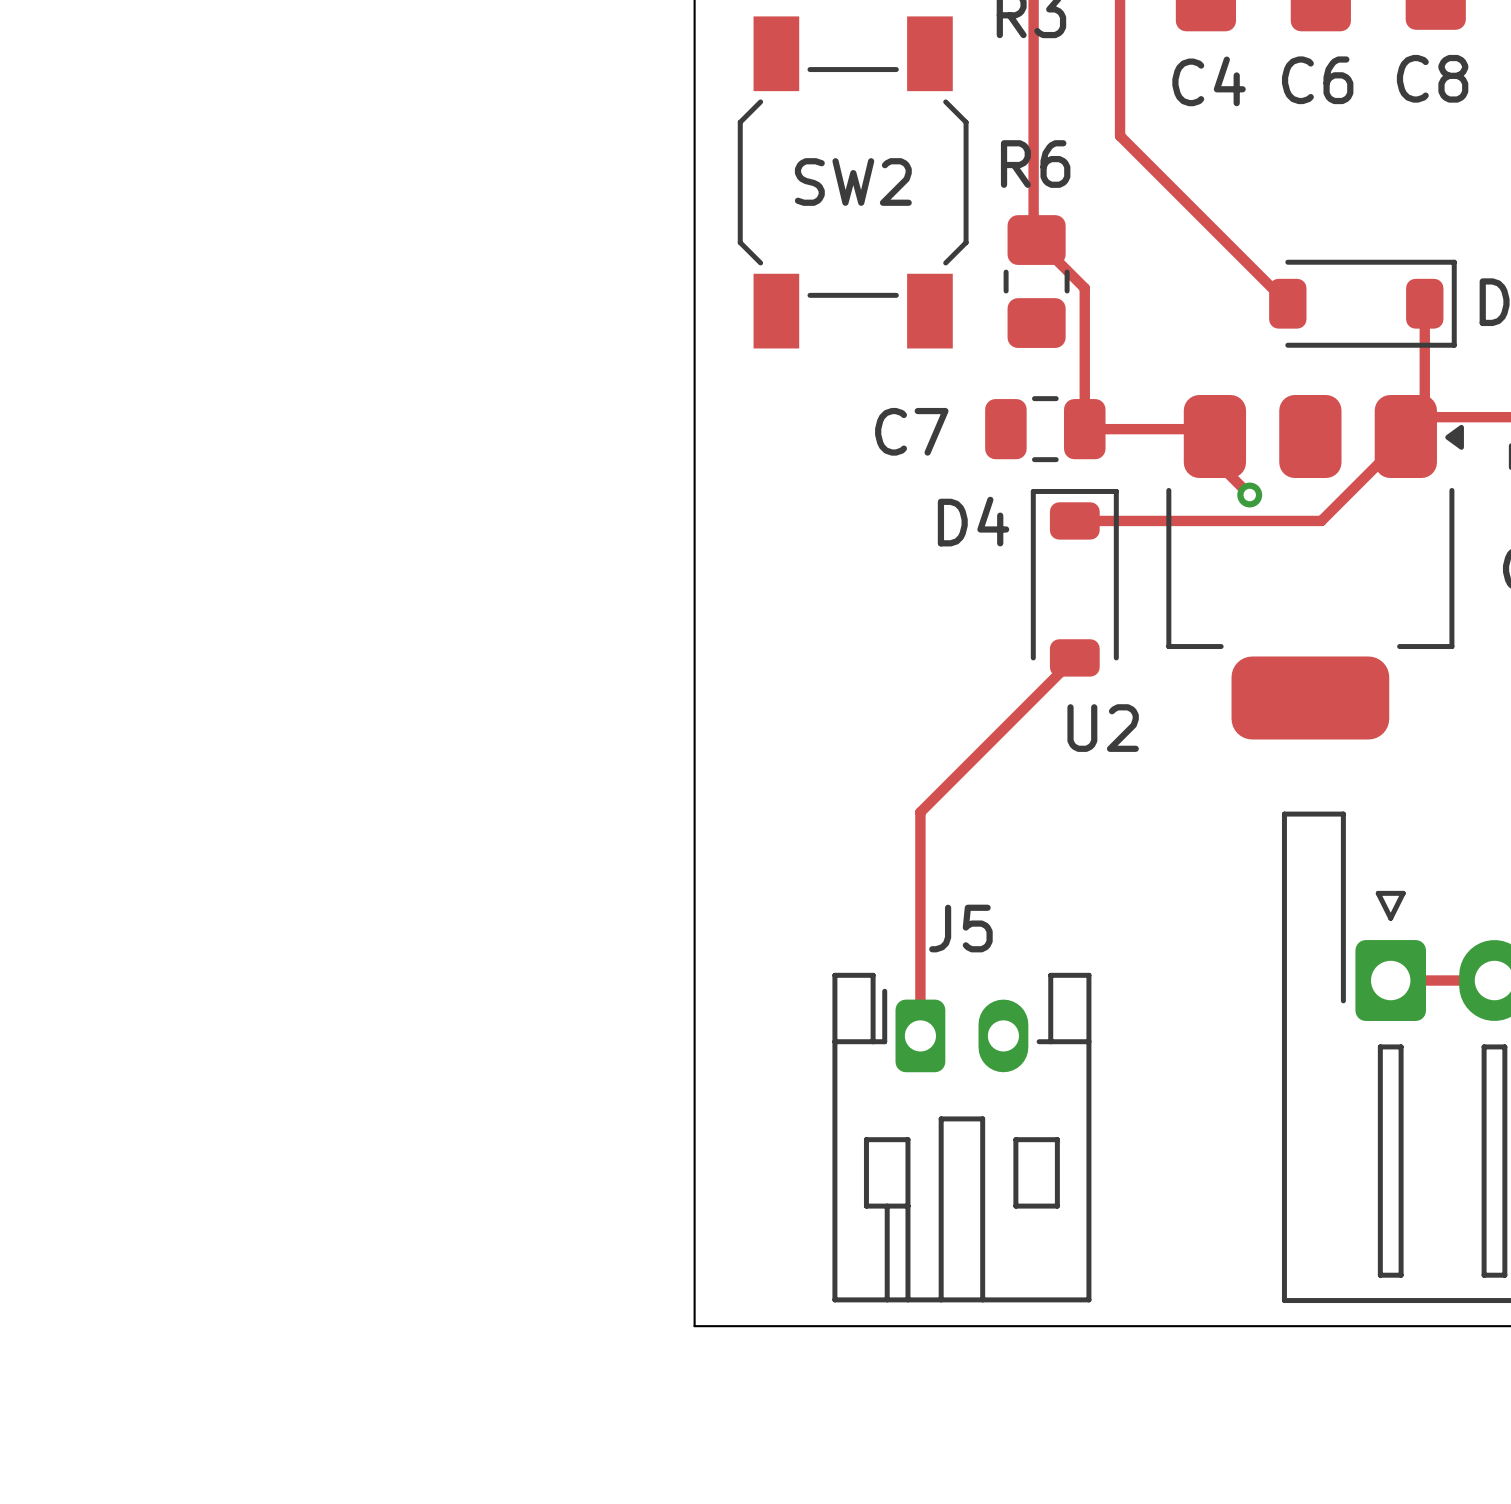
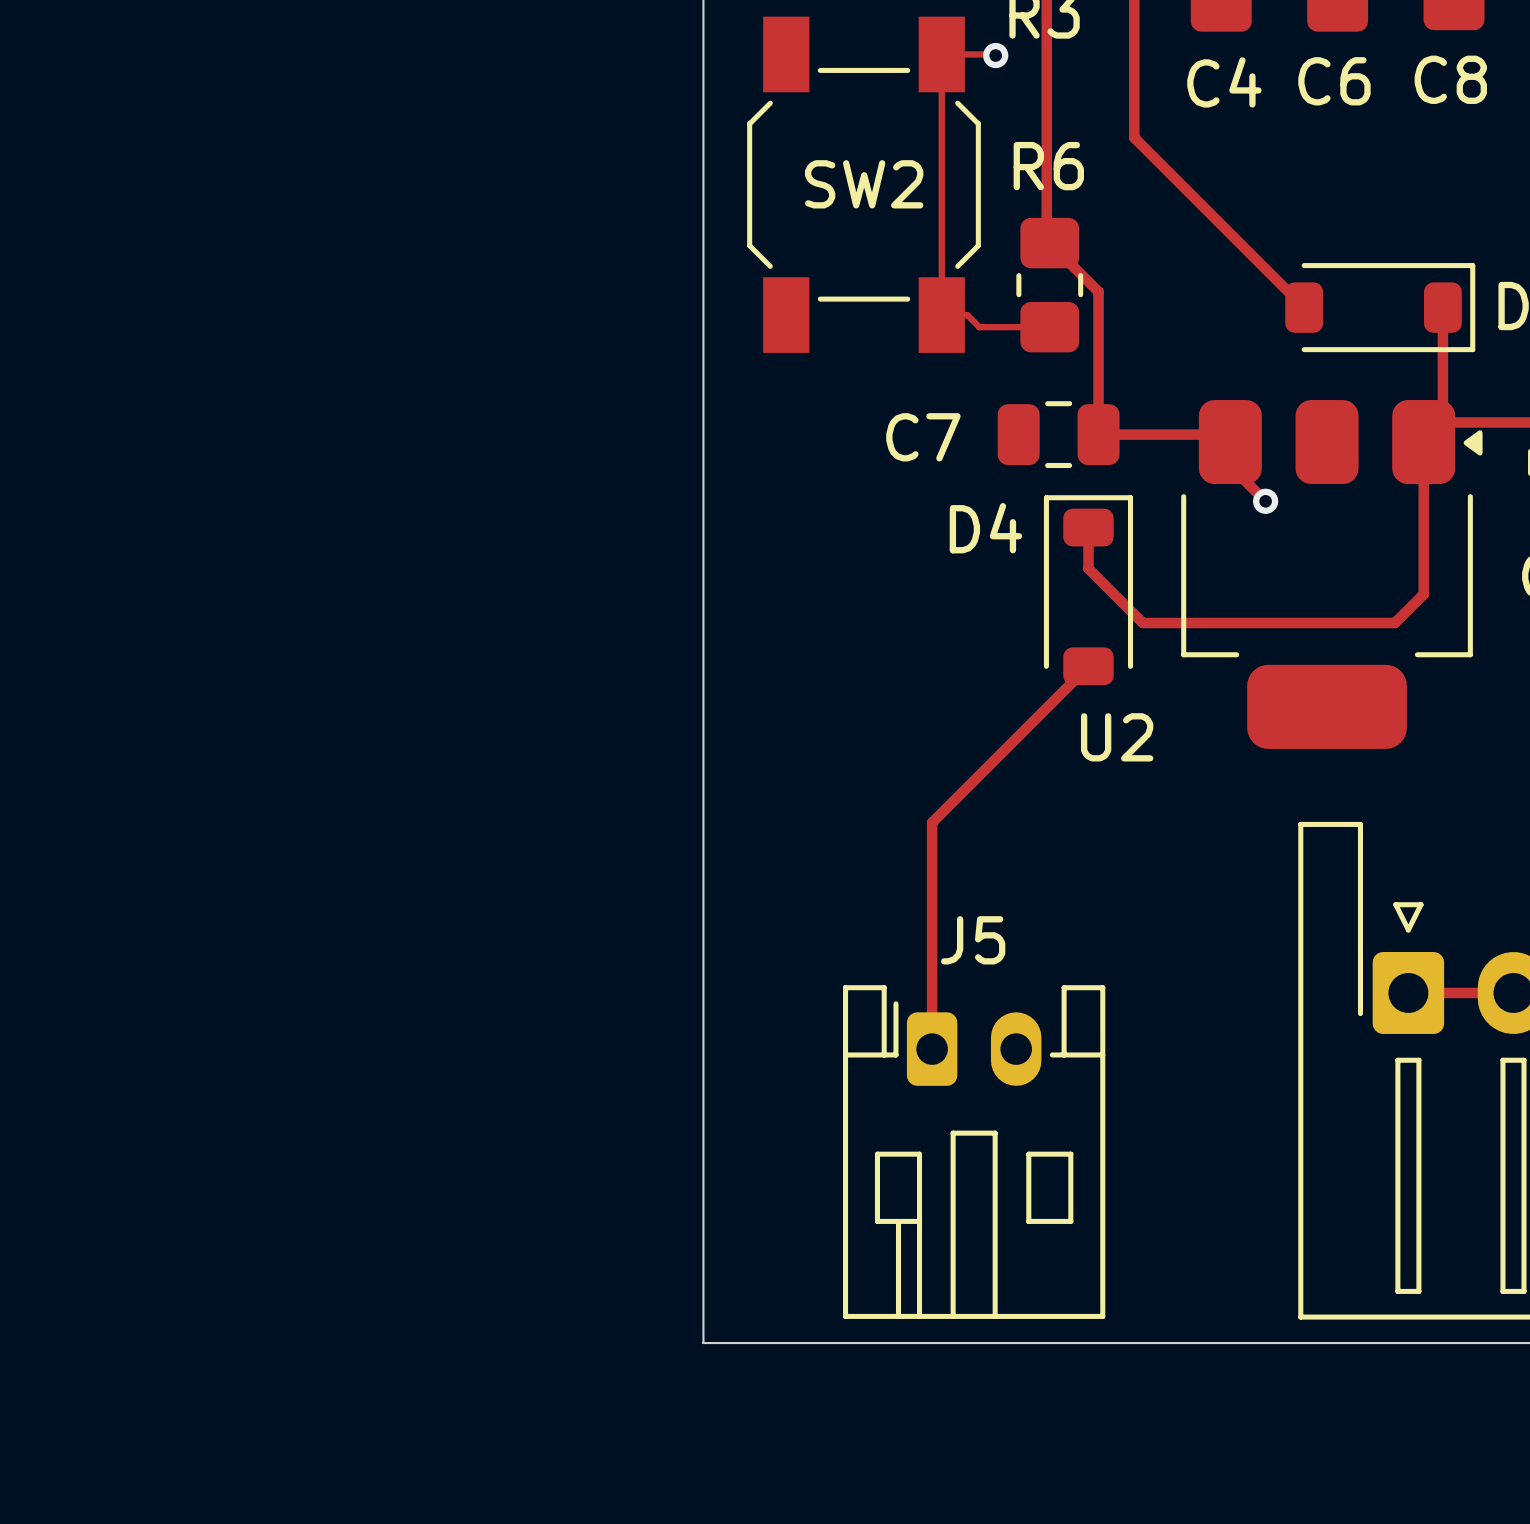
track: none -> (995, 55) (941, 54) (941, 315) (967, 315) (979, 327) (1049, 327)
via: none -> (995, 55)
track: (1405, 436) (1321, 520) (1074, 520) -> (1423, 442) (1423, 594) (1395, 623) (1142, 623) (1088, 568) (1088, 527)

